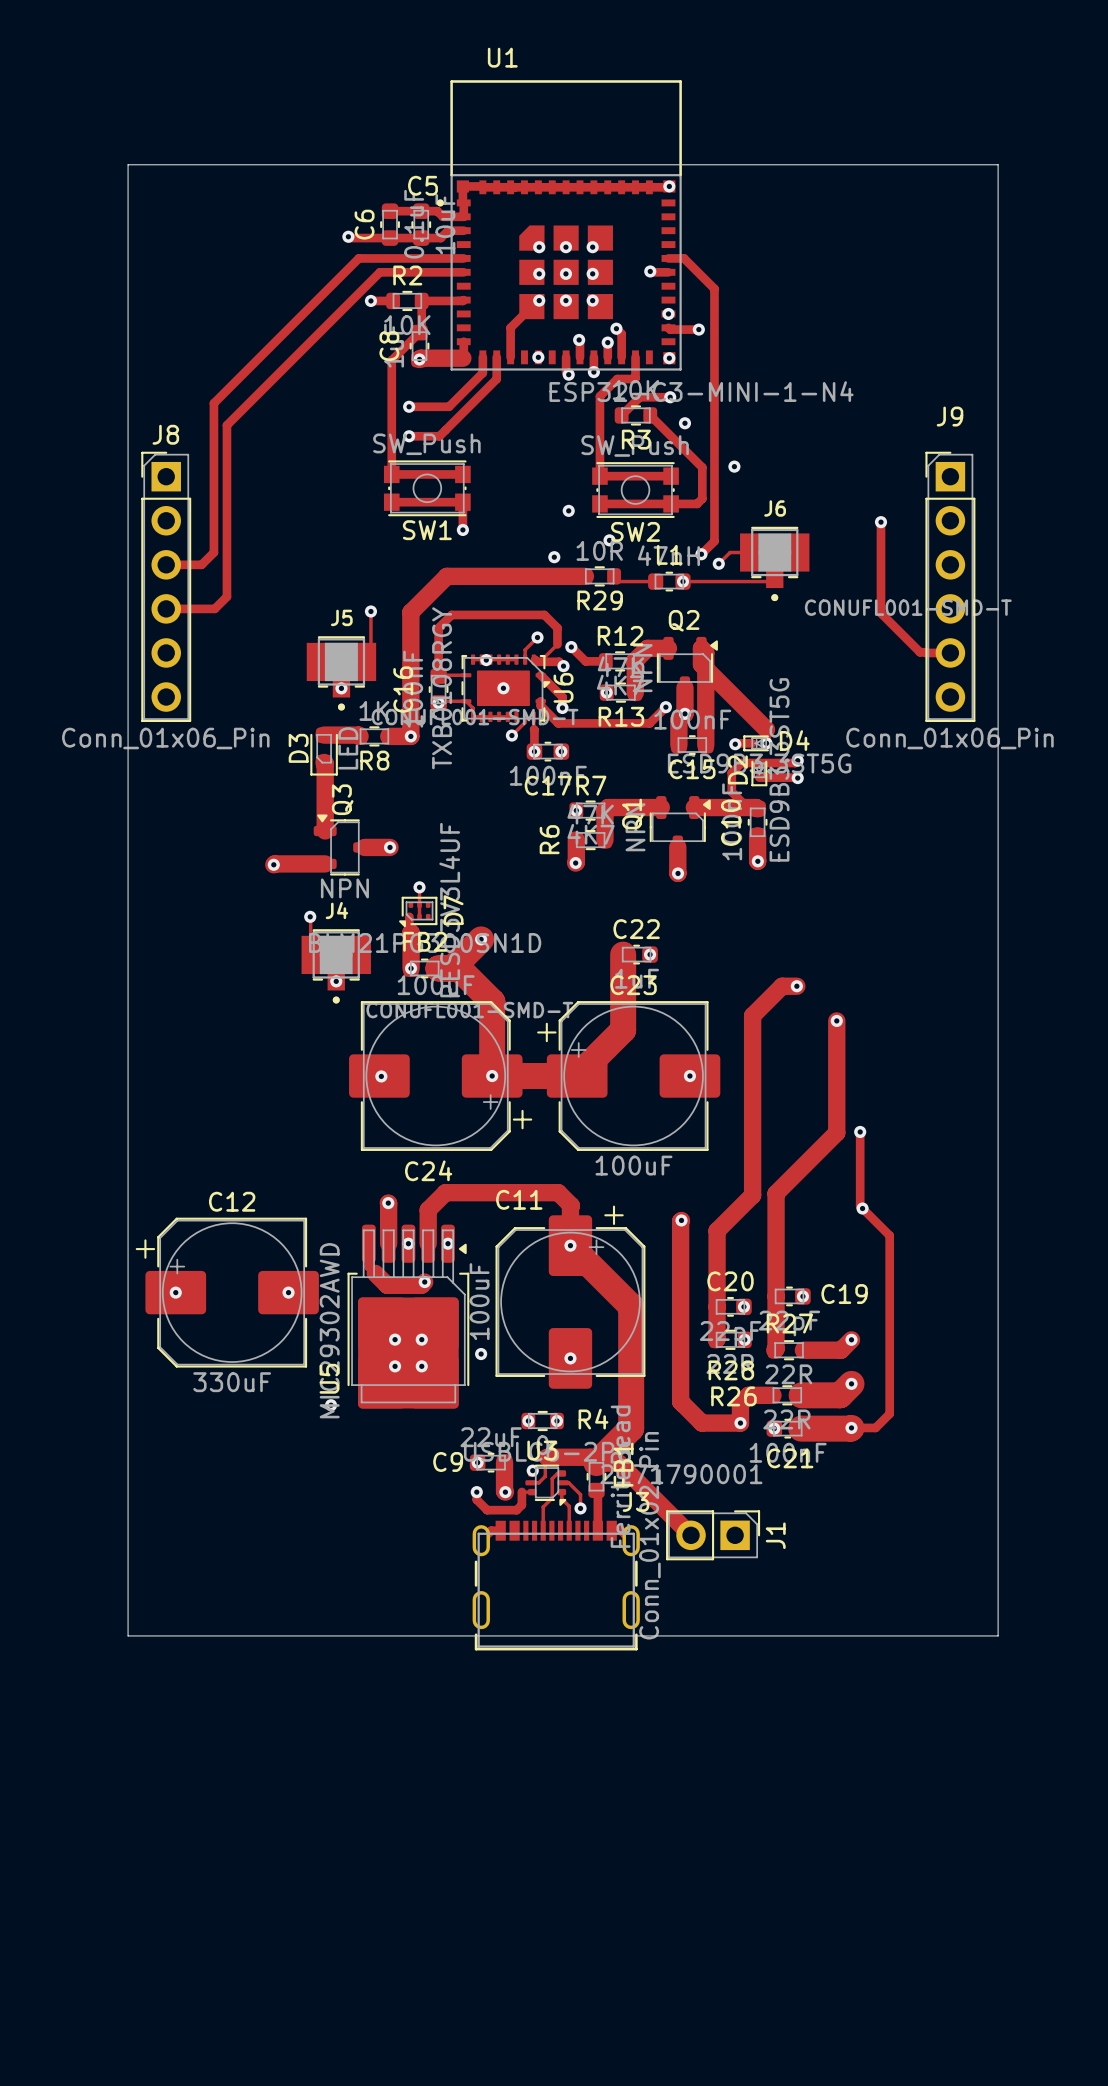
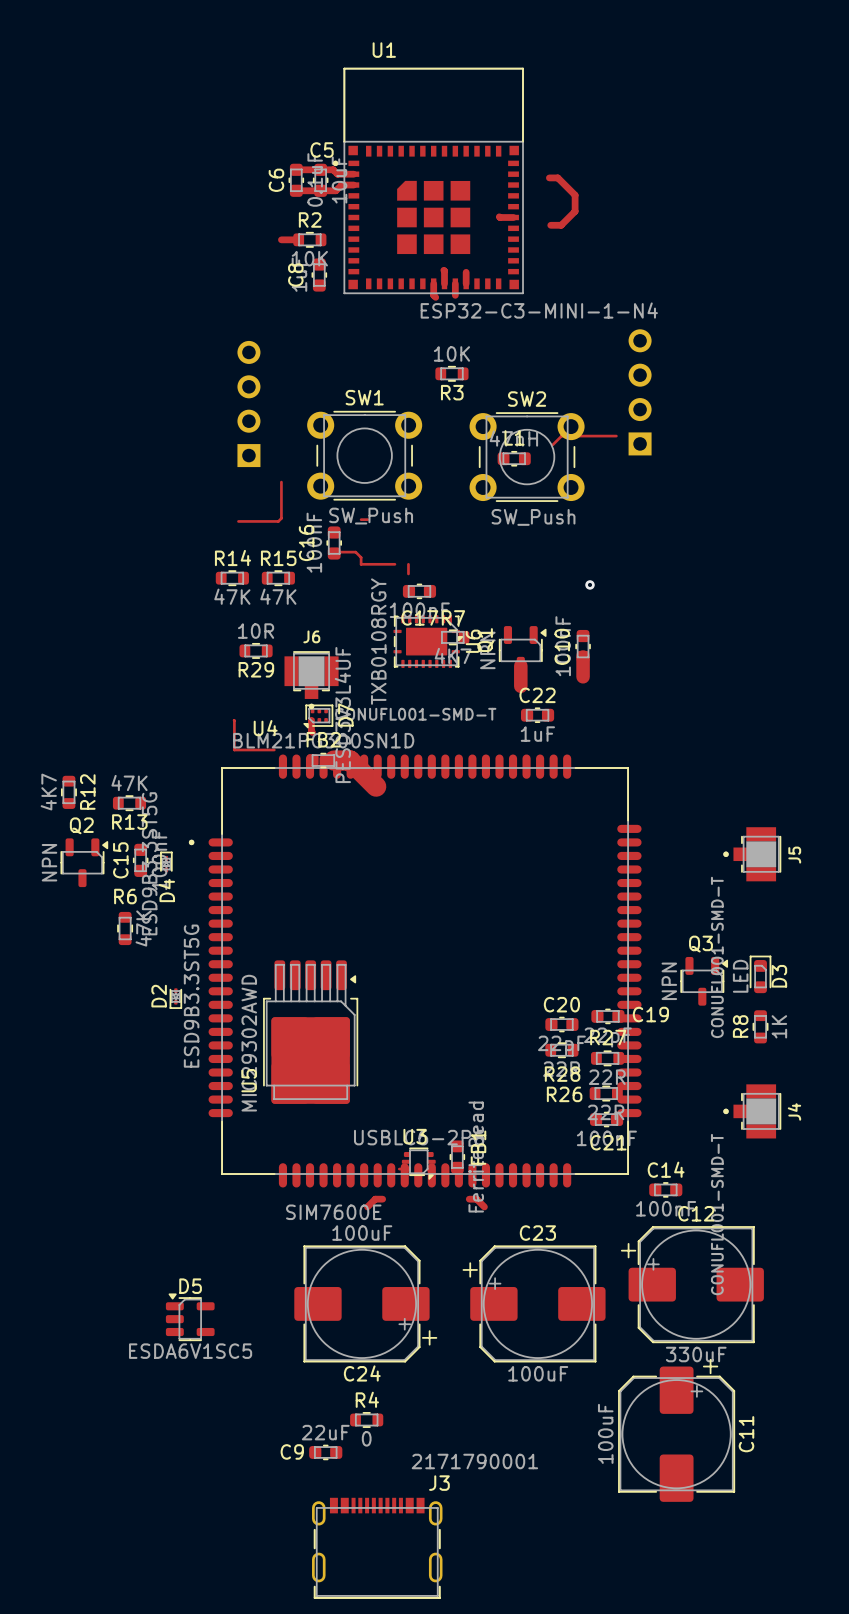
board edge: (128, 164) (998, 164) (998, 1635) (128, 1635) (128, 164) -> none
track: (669, 186) (462, 186) (463, 216) -> none
via: (669, 186) -> none
track: none -> (549, 177) (557, 177) (575, 195) (575, 211) (561, 225) (550, 225)
track: (348, 236) (390, 238) -> none
via: (348, 236) -> none
via: (539, 247) -> none
via: (565, 247) -> none
via: (592, 247) -> none
track: (463, 258) (358, 258) (213, 403) (213, 552) (201, 564) (166, 564) -> none
track: (668, 258) (684, 258) (714, 288) (714, 541) (701, 554) -> none
via: (650, 271) -> none
track: (463, 272) (379, 272) (226, 425) (226, 596) (214, 608) (166, 608) -> none
via: (539, 273) -> none
via: (565, 273) -> none
via: (592, 273) -> none
via: (370, 300) -> none
track: (463, 300) (421, 300) (421, 330) (391, 360) (391, 474) (462, 474) -> none
via: (539, 300) -> none
via: (565, 300) -> none
via: (592, 300) -> none
track: (531, 306) (510, 327) (510, 357) -> none
via: (668, 313) -> none
track: (668, 327) (670, 329) (698, 329) -> none
track: (616, 328) (621, 333) (621, 357) -> none
via: (616, 328) -> none
via: (698, 329) -> none
via: (579, 339) -> none
track: (463, 341) (462, 358) (419, 359) -> none
via: (607, 342) -> none
track: (482, 357) (482, 372) (449, 406) (409, 406) -> none
track: (496, 357) (496, 379) (439, 436) (409, 436) -> none
via: (538, 357) -> none
track: (635, 357) (635, 378) (617, 379) (599, 396) (599, 476) (671, 476) -> none
via: (669, 358) -> none
via: (419, 359) -> none
via: (593, 372) -> none
via: (568, 374) -> none
track: (670, 397) (639, 397) (621, 415) -> none
via: (670, 397) -> none
via: (409, 406) -> none
R3 position: (635, 415) -> (451, 373)
track: (650, 415) (702, 467) (702, 498) (697, 503) (599, 503) -> none
via: (684, 423) -> none
via: (409, 436) -> none
SW1 value position: SW_Push (426, 444) -> SW_Push (371, 516)
SW2 value position: SW_Push (635, 445) -> SW_Push (533, 517)
SW1 footprint: [383, 460, 471, 517] -> [307, 410, 423, 501]
SW2 footprint: [592, 462, 679, 518] -> [469, 412, 585, 502]
via: (734, 466) -> none
part: none -> (640, 392)
track: (391, 502) (462, 502) (462, 529) -> none
via: (568, 510) -> none
part: none -> (248, 404)
track: (881, 522) (881, 613) (920, 652) (950, 652) -> none
via: (881, 522) -> none
via: (462, 529) -> none
SW1 name position: SW1 (427, 530) -> SW1 (364, 397)
SW2 name position: SW2 (635, 531) -> SW2 (527, 399)
via: (609, 540) -> none
via: (701, 554) -> none
via: (554, 557) -> none
via: (718, 563) -> none
J6 position: (774, 563) -> (311, 680)
track: (585, 576) (446, 576) (410, 612) (410, 736) (388, 736) -> none
R29 position: (599, 576) -> (256, 650)
track: (614, 576) (619, 581) (655, 581) -> none
track: (774, 578) (772, 581) (683, 581) -> none
via: (683, 581) -> none
J8: Conn_01x06_Pin (166, 586) -> none
J9: Conn_01x06_Pin (950, 586) -> none
via: (370, 611) -> none
track: (537, 637) (525, 649) (525, 659) -> none
via: (537, 637) -> none
track: (571, 647) (585, 661) (605, 661) -> none
via: (571, 647) -> none
track: (668, 648) (647, 648) (634, 661) (635, 692) -> none
track: (516, 659) (486, 660) -> none
track: (533, 659) (542, 659) (557, 644) (557, 627) (544, 614) (451, 614) (438, 627) (438, 676) (466, 675) -> none
track: (535, 659) (535, 661) (559, 661) (563, 666) -> none
via: (486, 660) -> none
R12 rotation: 0° (620, 661) -> 90° clockwise (68, 792)
R12 position: (620, 661) -> (68, 792)
via: (563, 666) -> none
Q2 position: (687, 668) -> (84, 862)
J5 rotation: 0° (341, 673) -> 90° clockwise (752, 854)
J5 position: (341, 673) -> (752, 854)
track: (540, 675) (562, 697) (562, 707) -> none
track: (684, 687) (684, 713) (678, 719) (678, 745) -> none
via: (341, 688) -> none
via: (503, 688) -> none
U6 position: (505, 688) -> (428, 641)
via: (606, 692) -> none
R13 position: (620, 692) -> (129, 803)
track: (540, 701) (540, 705) (558, 723) (649, 723) (665, 707) -> none
via: (438, 703) -> none
via: (562, 707) -> none
via: (665, 707) -> none
via: (684, 713) -> none
track: (525, 716) (525, 722) (512, 735) -> none
track: (534, 729) (534, 751) -> none
R14: none -> 47K (232, 578)
R15: none -> 47K (278, 578)
track: (324, 735) (360, 736) -> none
via: (511, 735) -> none
R8 rotation: 0° (374, 736) -> 90° clockwise (760, 1026)
R8 position: (374, 736) -> (760, 1026)
via: (410, 736) -> none
track: (751, 743) (735, 744) -> none
D4 rotation: 0° (756, 743) -> 90° clockwise (166, 861)
D4 position: (756, 743) -> (166, 861)
track: (766, 743) (766, 729) (701, 664) (701, 648) (705, 652) (705, 745) -> none
via: (735, 744) -> none
C15 rotation: 0° (692, 745) -> 90° clockwise (140, 860)
C15 position: (692, 745) -> (140, 860)
D3 rotation: 0° (324, 751) -> 180° (760, 974)
D3 position: (324, 751) -> (760, 974)
via: (534, 751) -> none
via: (561, 751) -> none
track: (797, 760) (795, 763) (741, 763) (731, 772) (731, 791) (748, 808) (757, 808) (756, 807) (694, 807) -> none
via: (797, 760) -> none
track: (324, 762) (325, 830) -> none
D2 position: (759, 773) -> (175, 998)
track: (759, 777) (797, 778) -> none
via: (797, 778) -> none
track: (661, 807) (607, 807) (604, 810) (604, 840) -> none
via: (576, 810) -> none
track: (576, 840) (575, 863) -> none
R6 rotation: 0° (590, 840) -> 90° clockwise (125, 928)
R6 position: (590, 840) -> (125, 928)
Q3 rotation: 0° (344, 845) -> 90° clockwise (704, 981)
Q3 position: (344, 845) -> (704, 981)
track: (364, 847) (390, 847) -> none
via: (390, 847) -> none
via: (757, 861) -> none
track: (325, 863) (273, 864) -> none
via: (575, 863) -> none
via: (273, 864) -> none
via: (678, 873) -> none
track: (419, 887) (419, 916) -> none
via: (419, 887) -> none
via: (310, 916) -> none
track: (411, 932) (411, 968) -> none
track: (481, 939) (452, 968) -> none
via: (481, 939) -> none
track: (623, 954) (623, 1030) (577, 1076) (492, 1076) (492, 1002) -> none
C22 position: (636, 954) -> (537, 715)
via: (650, 954) -> none
J4 rotation: 0° (336, 966) -> 90° clockwise (752, 1111)
J4 position: (336, 966) -> (752, 1111)
via: (411, 968) -> none
via: (336, 981) -> none
track: (796, 986) (782, 986) (752, 1015) (752, 1195) (717, 1230) (716, 1339) -> none
via: (796, 986) -> none
track: (836, 1020) (836, 1132) (776, 1193) (774, 1350) -> none
via: (836, 1020) -> none
via: (381, 1076) -> none
C24 position: (440, 1076) -> (365, 1303)
via: (492, 1076) -> none
C23 position: (628, 1076) -> (534, 1303)
via: (689, 1076) -> none
track: (860, 1131) (860, 1206) (889, 1235) (889, 1413) (875, 1427) (801, 1428) -> none
via: (860, 1131) -> none
C24 name position: C24 (428, 1170) -> C24 (362, 1373)
C11 name rotation: 0° (519, 1199) -> 90° counterclockwise (746, 1434)
C11 name position: C11 (519, 1199) -> C11 (746, 1434)
track: (388, 1203) (388, 1243) -> none
via: (388, 1203) -> none
via: (862, 1208) -> none
track: (681, 1220) (680, 1401) (701, 1423) (740, 1423) (740, 1403) (748, 1395) (773, 1395) -> none
via: (681, 1220) -> none
U4: none -> SIM7600E (415, 971)
track: (368, 1243) (368, 1266) (387, 1285) (421, 1285) (424, 1282) -> none
via: (408, 1243) -> none
track: (428, 1243) (428, 1210) (445, 1192) (558, 1192) (571, 1205) (570, 1245) (631, 1306) (631, 1428) (596, 1463) -> none
via: (447, 1243) -> none
via: (570, 1245) -> none
via: (424, 1282) -> none
via: (175, 1292) -> none
C12 position: (227, 1292) -> (692, 1284)
via: (288, 1292) -> none
via: (802, 1296) -> none
C11 position: (570, 1297) -> (676, 1430)
via: (743, 1306) -> none
via: (395, 1339) -> none
via: (421, 1339) -> none
via: (744, 1339) -> none
track: (851, 1339) (841, 1350) (803, 1350) -> none
via: (851, 1339) -> none
via: (481, 1354) -> none
via: (570, 1358) -> none
via: (395, 1366) -> none
via: (421, 1366) -> none
track: (851, 1383) (840, 1395) (801, 1395) -> none
via: (851, 1383) -> none
via: (331, 1405) -> none
R4 name position: R4 (593, 1419) -> R4 (367, 1399)
via: (528, 1421) -> none
R4 position: (542, 1421) -> (366, 1419)
via: (557, 1421) -> none
via: (740, 1423) -> none
via: (851, 1427) -> none
via: (774, 1428) -> none
via: (477, 1462) -> none
C9 position: (491, 1462) -> (325, 1452)
track: (504, 1462) (505, 1492) -> none
track: (596, 1463) (618, 1463) (691, 1535) -> none
track: (596, 1463) (590, 1457) (547, 1457) (545, 1458) (545, 1476) (538, 1482) (530, 1482) -> none
via: (532, 1470) -> none
track: (561, 1473) (557, 1473) (552, 1478) (552, 1498) (543, 1507) (543, 1530) -> none
track: (563, 1482) (568, 1482) (580, 1494) (580, 1508) -> none
track: (596, 1490) (597, 1530) -> none
track: (521, 1491) (521, 1504) (516, 1510) (487, 1510) (476, 1499) (476, 1492) -> none
via: (476, 1492) -> none
via: (505, 1492) -> none
track: (561, 1492) (561, 1498) (569, 1506) (569, 1530) -> none
via: (580, 1508) -> none
C14: none -> 100nF (665, 1189)
J1: Conn_01x02_Pin (713, 1535) -> none
J3 position: (556, 1585) -> (377, 1548)
D5: none -> ESDA6V1SC5 (190, 1317)

